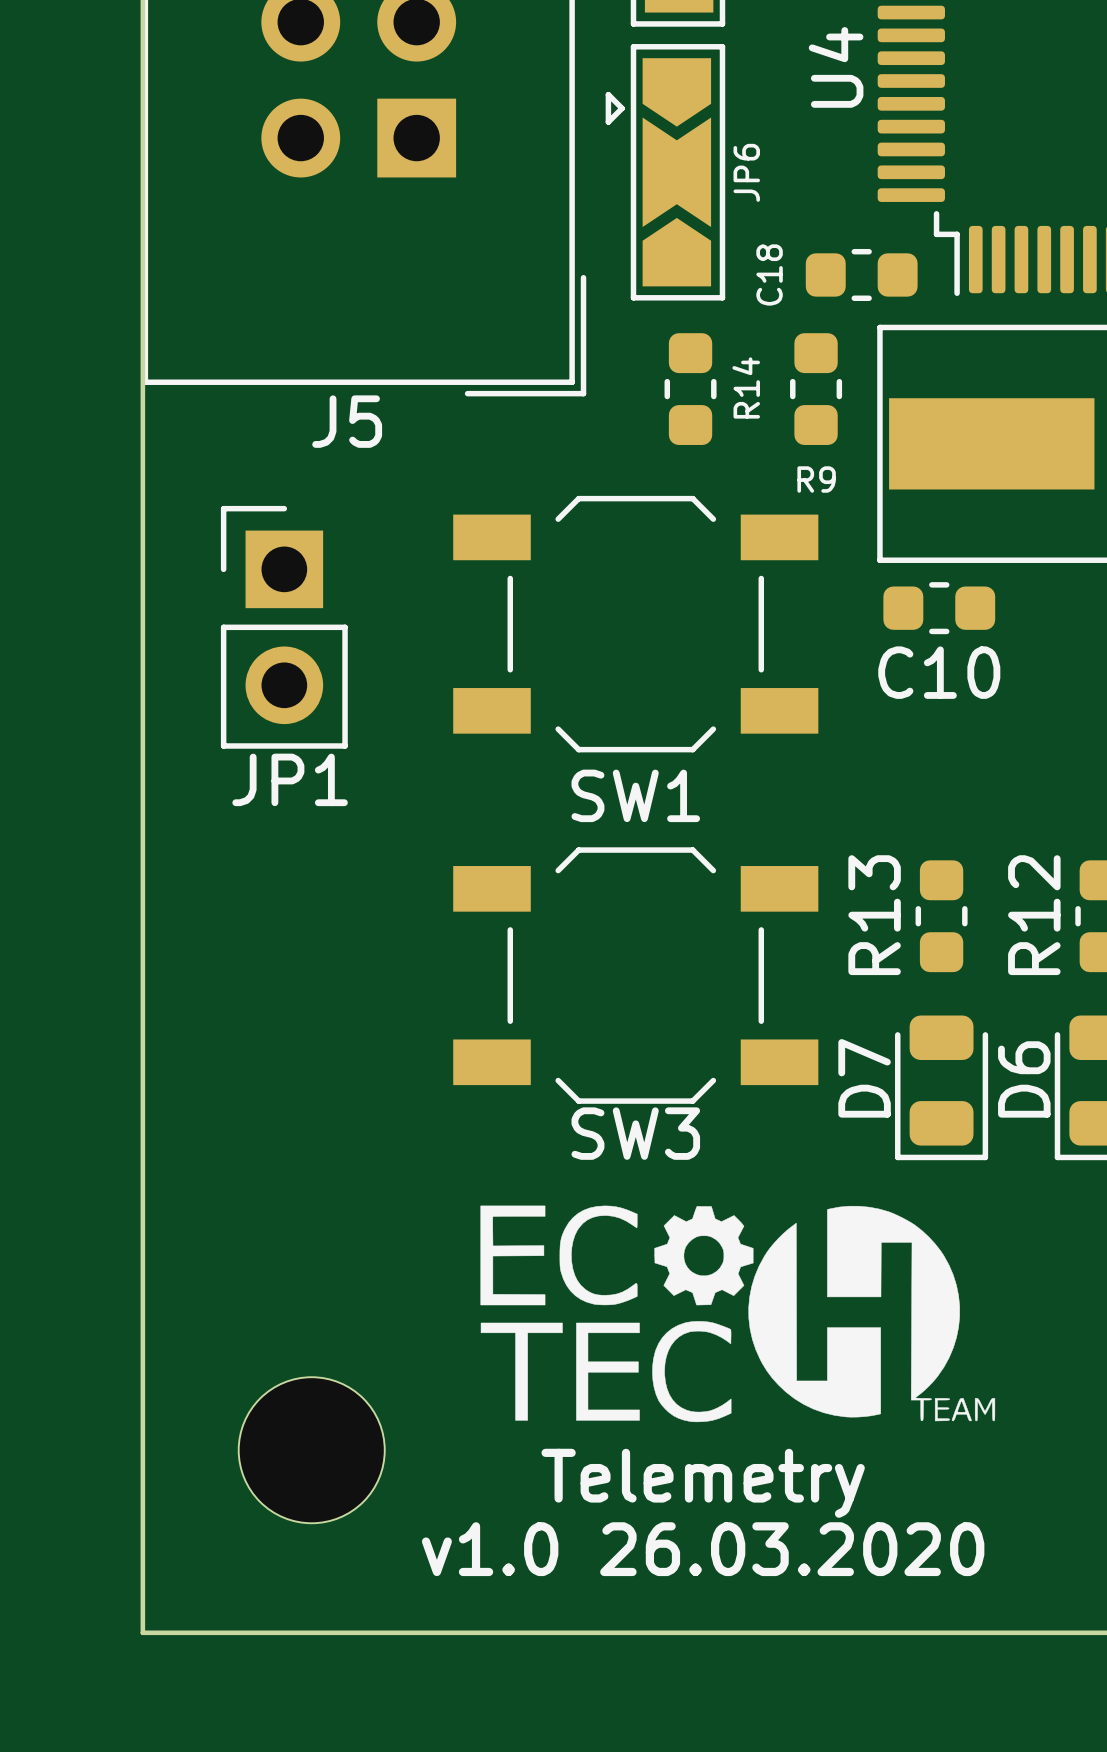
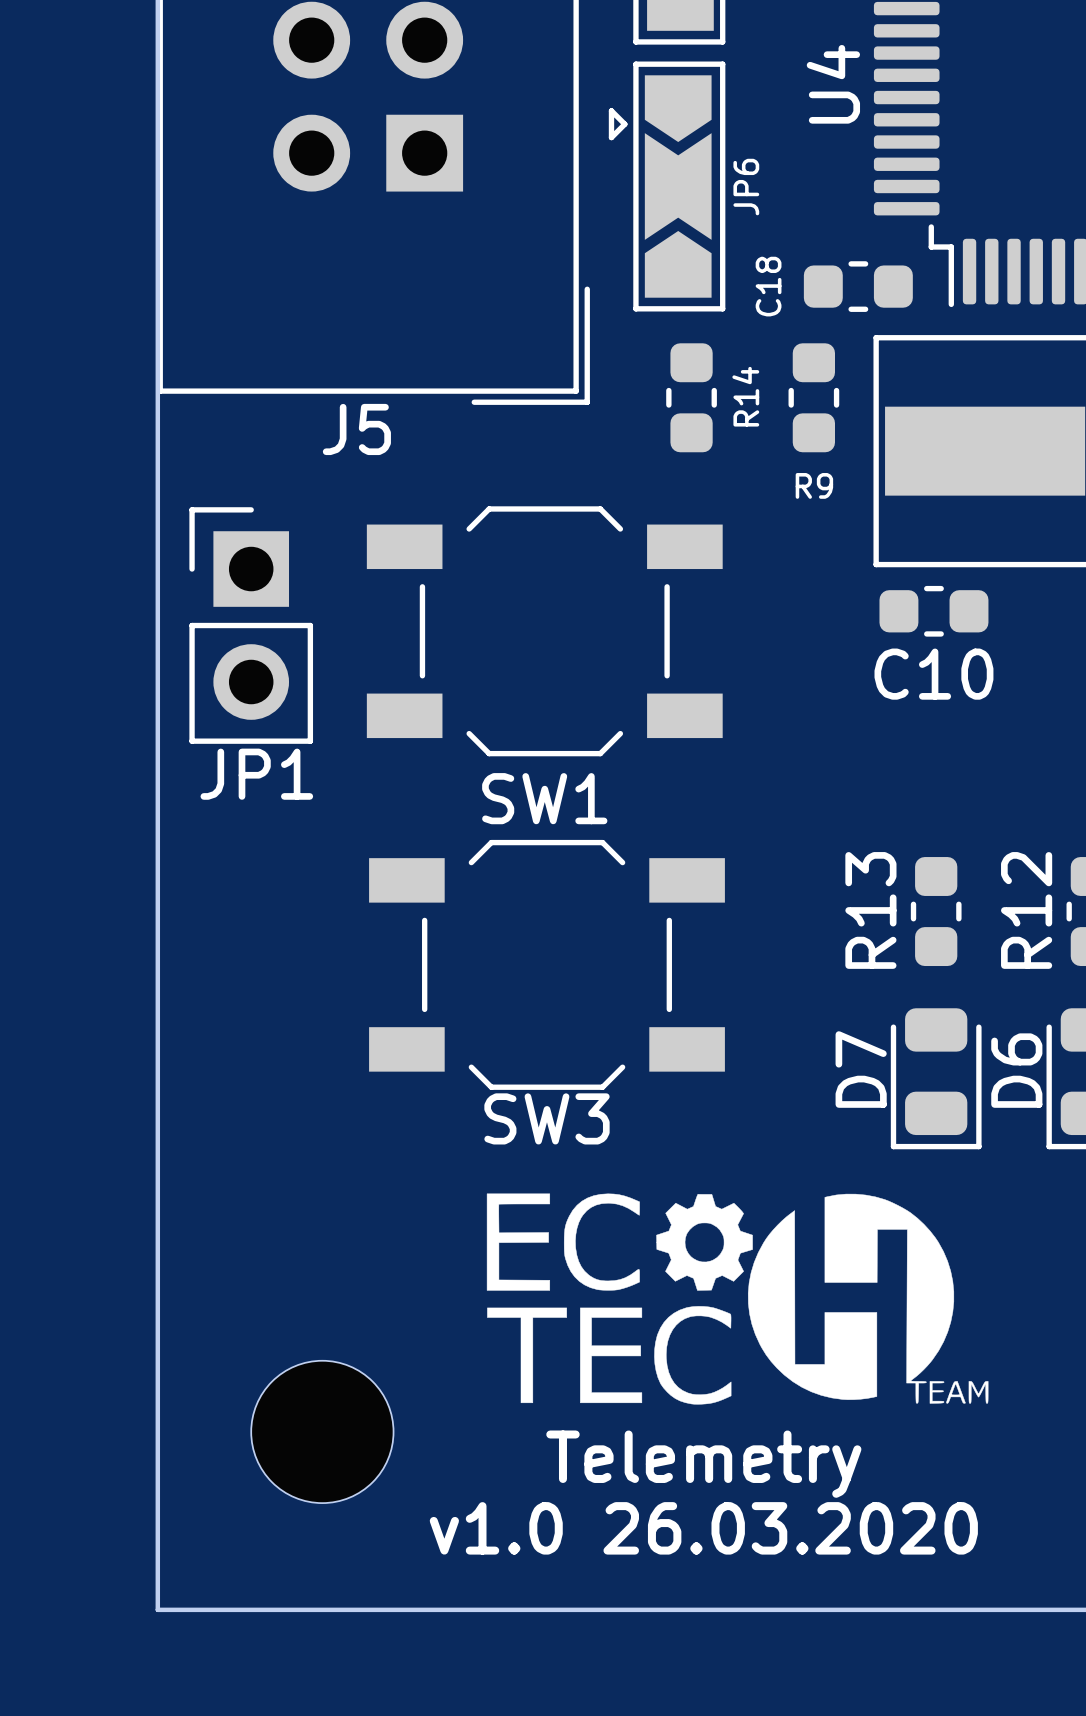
SW1 position: (635, 624) -> (544, 631)
JP1 position: (284, 627) -> (251, 625)
SW3 position: (635, 975) -> (546, 964)

